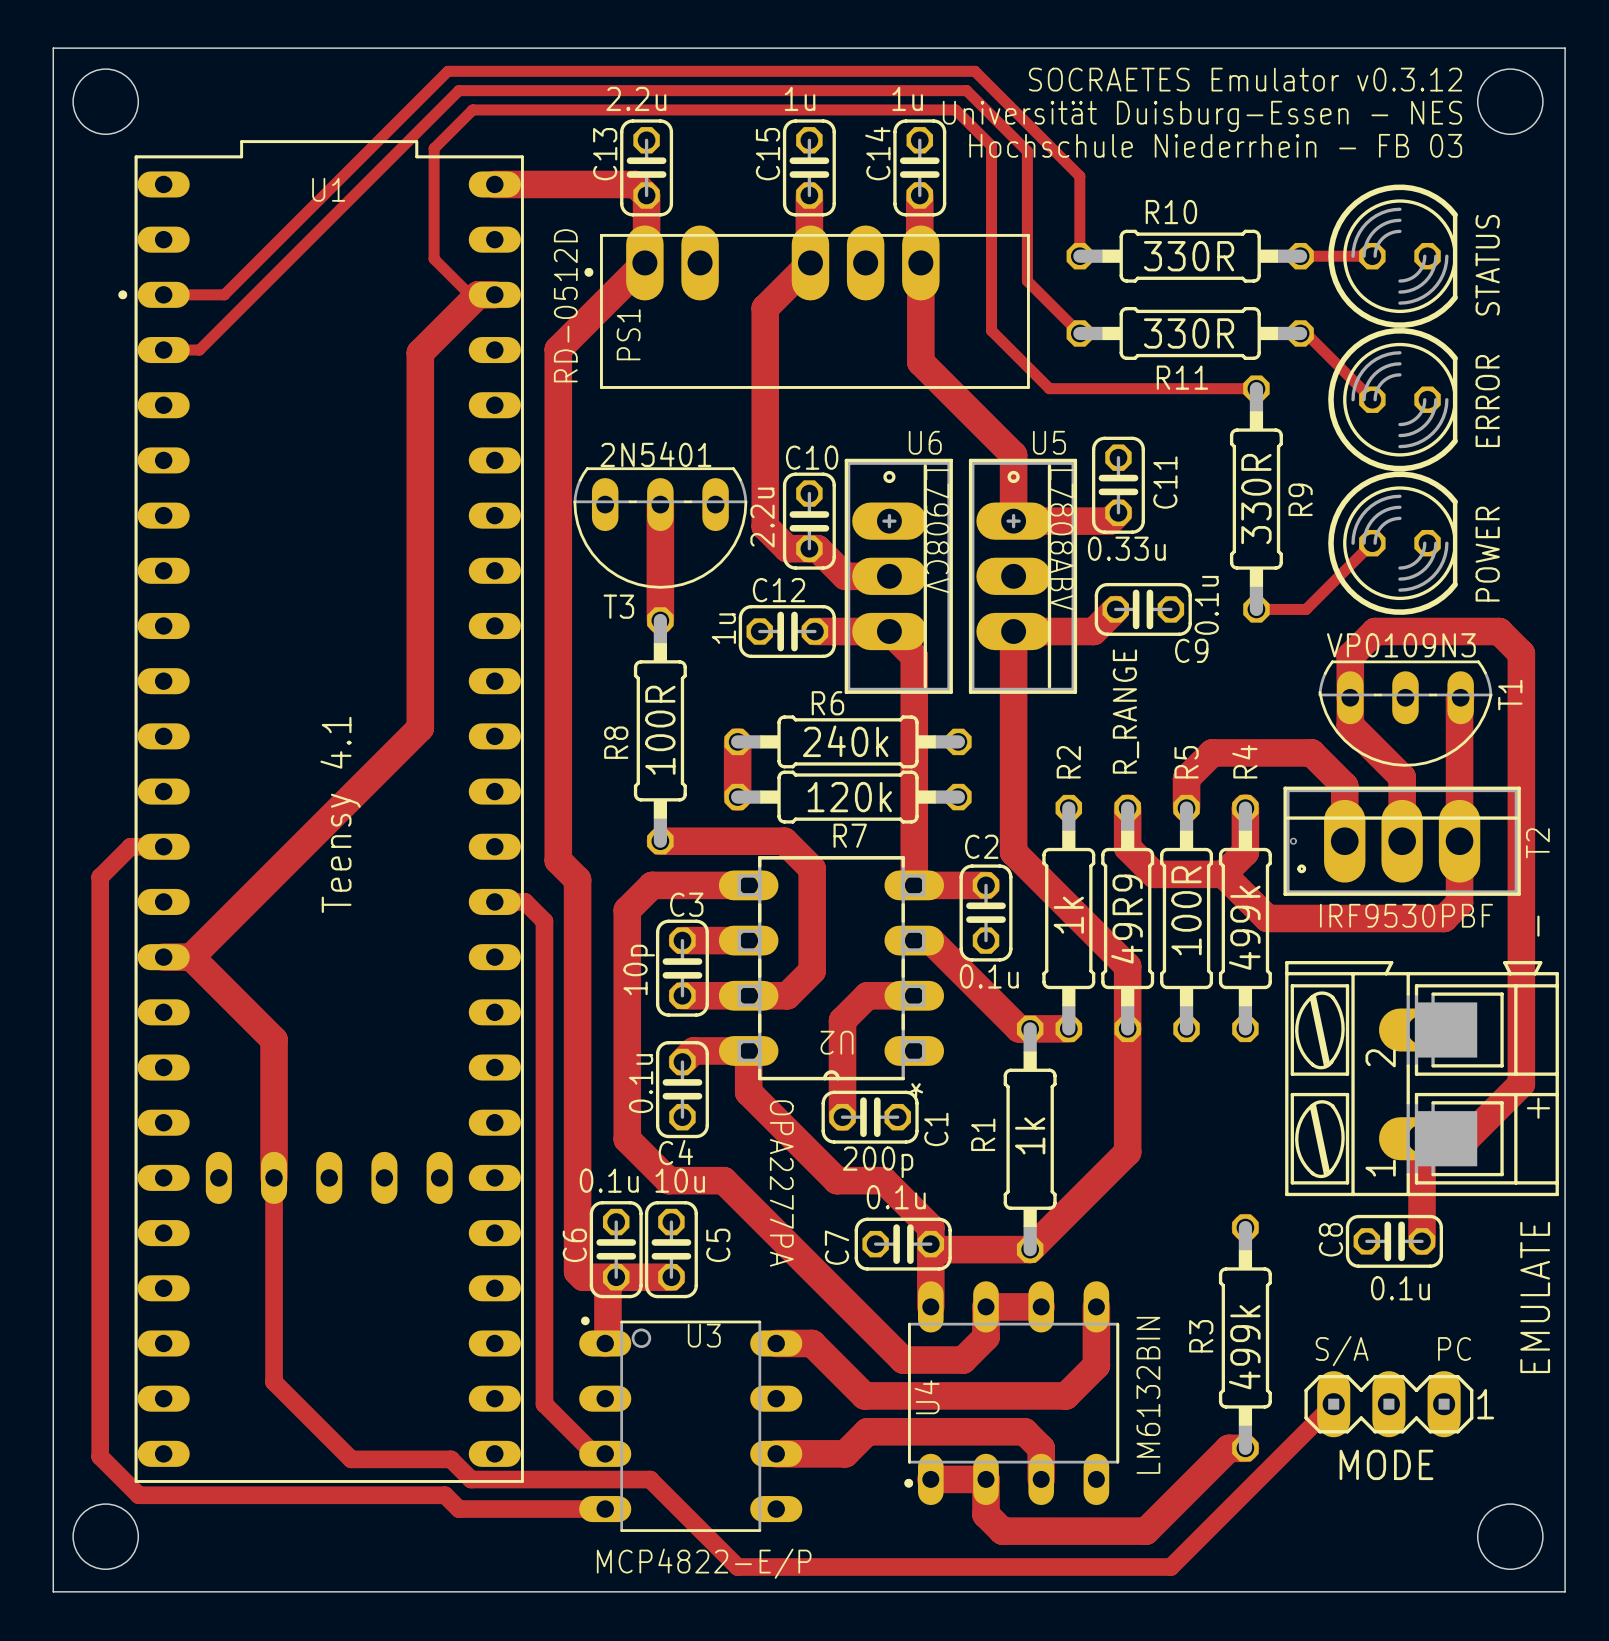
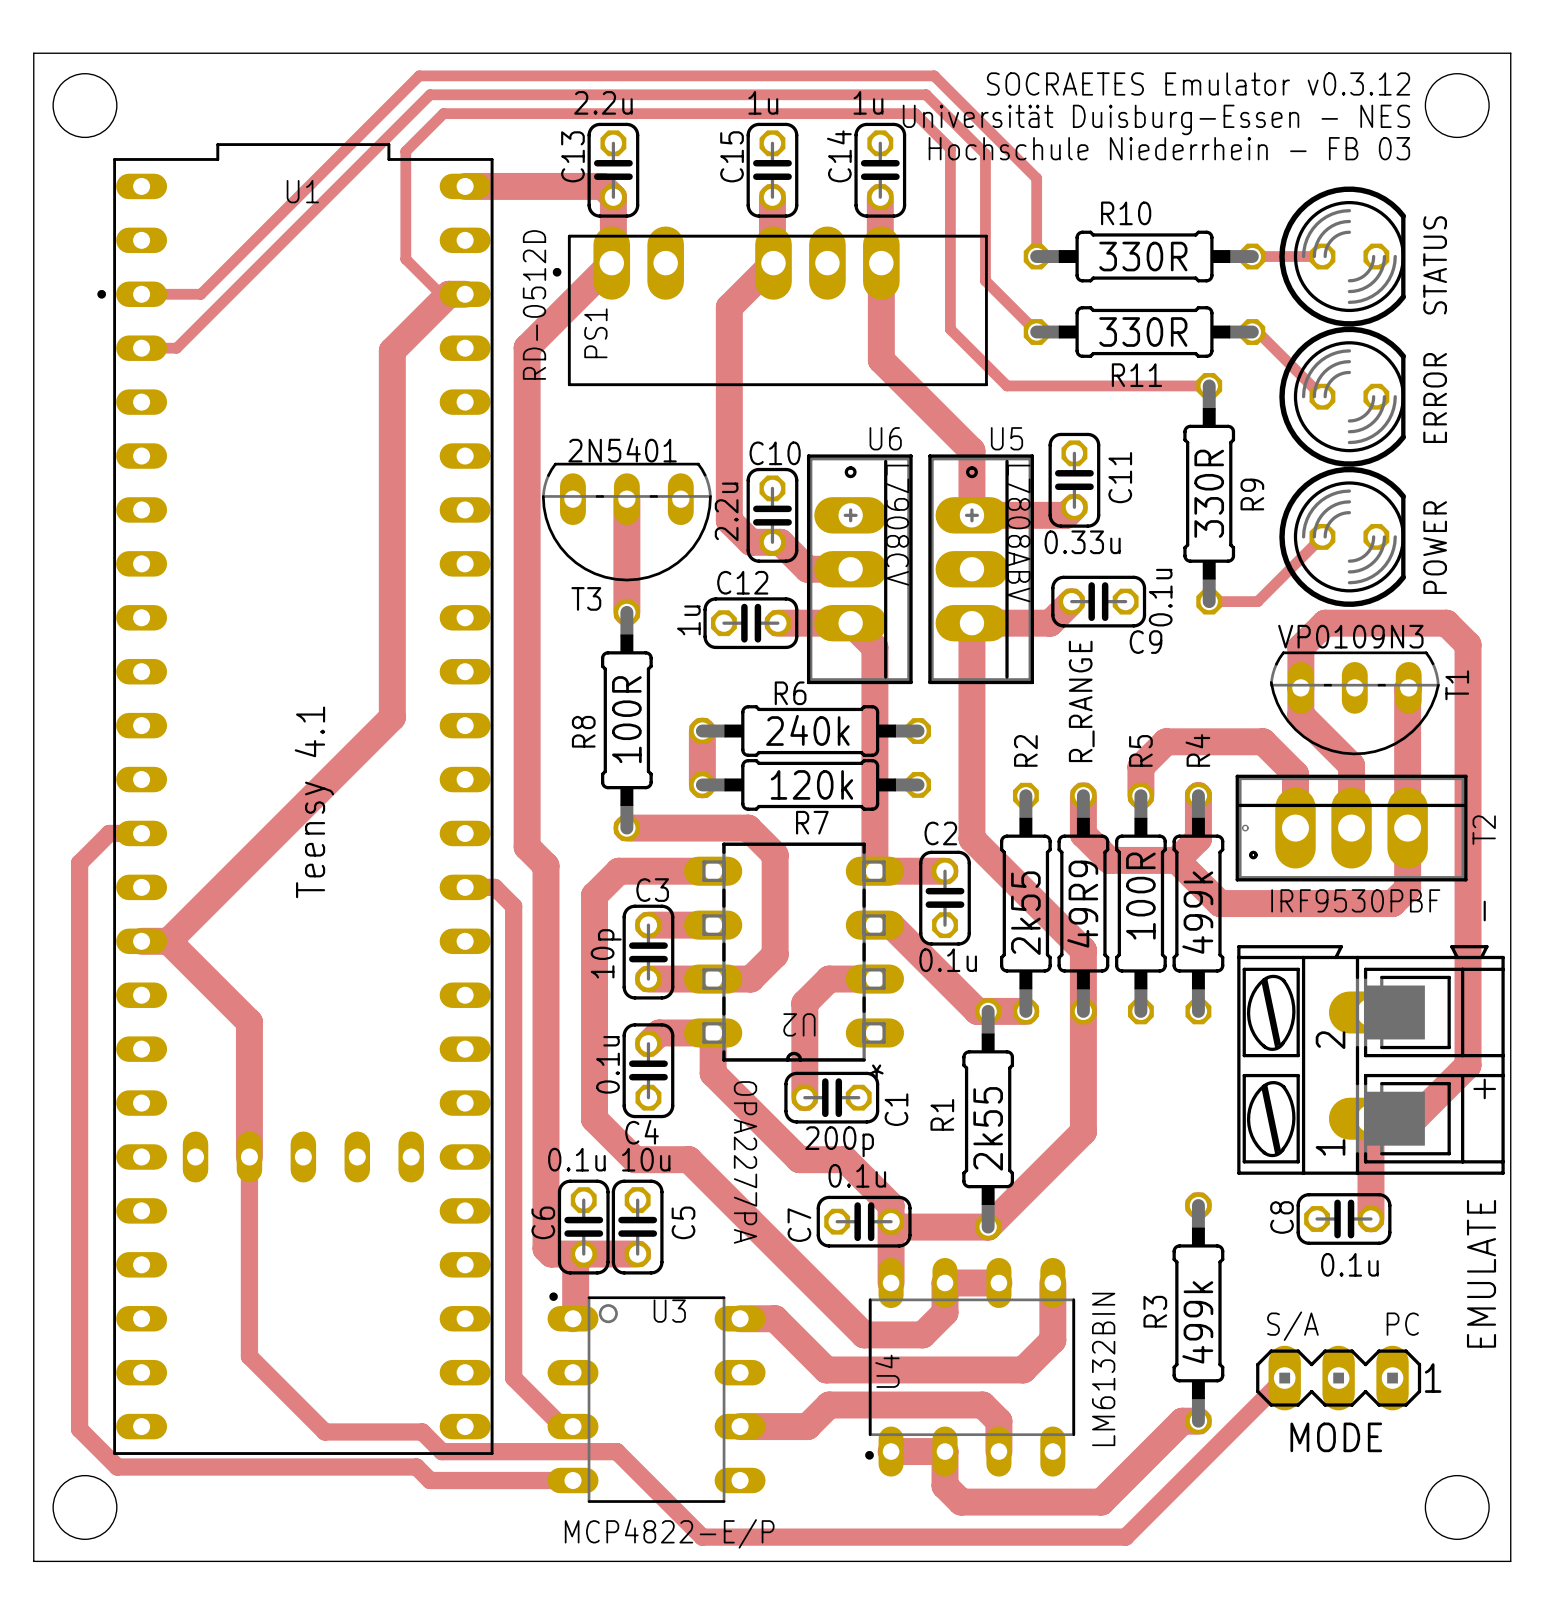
R2 value: 1k (1068, 915) -> 2k55 (1025, 913)
R1 value: 1k (1030, 1135) -> 2k55 (988, 1128)

